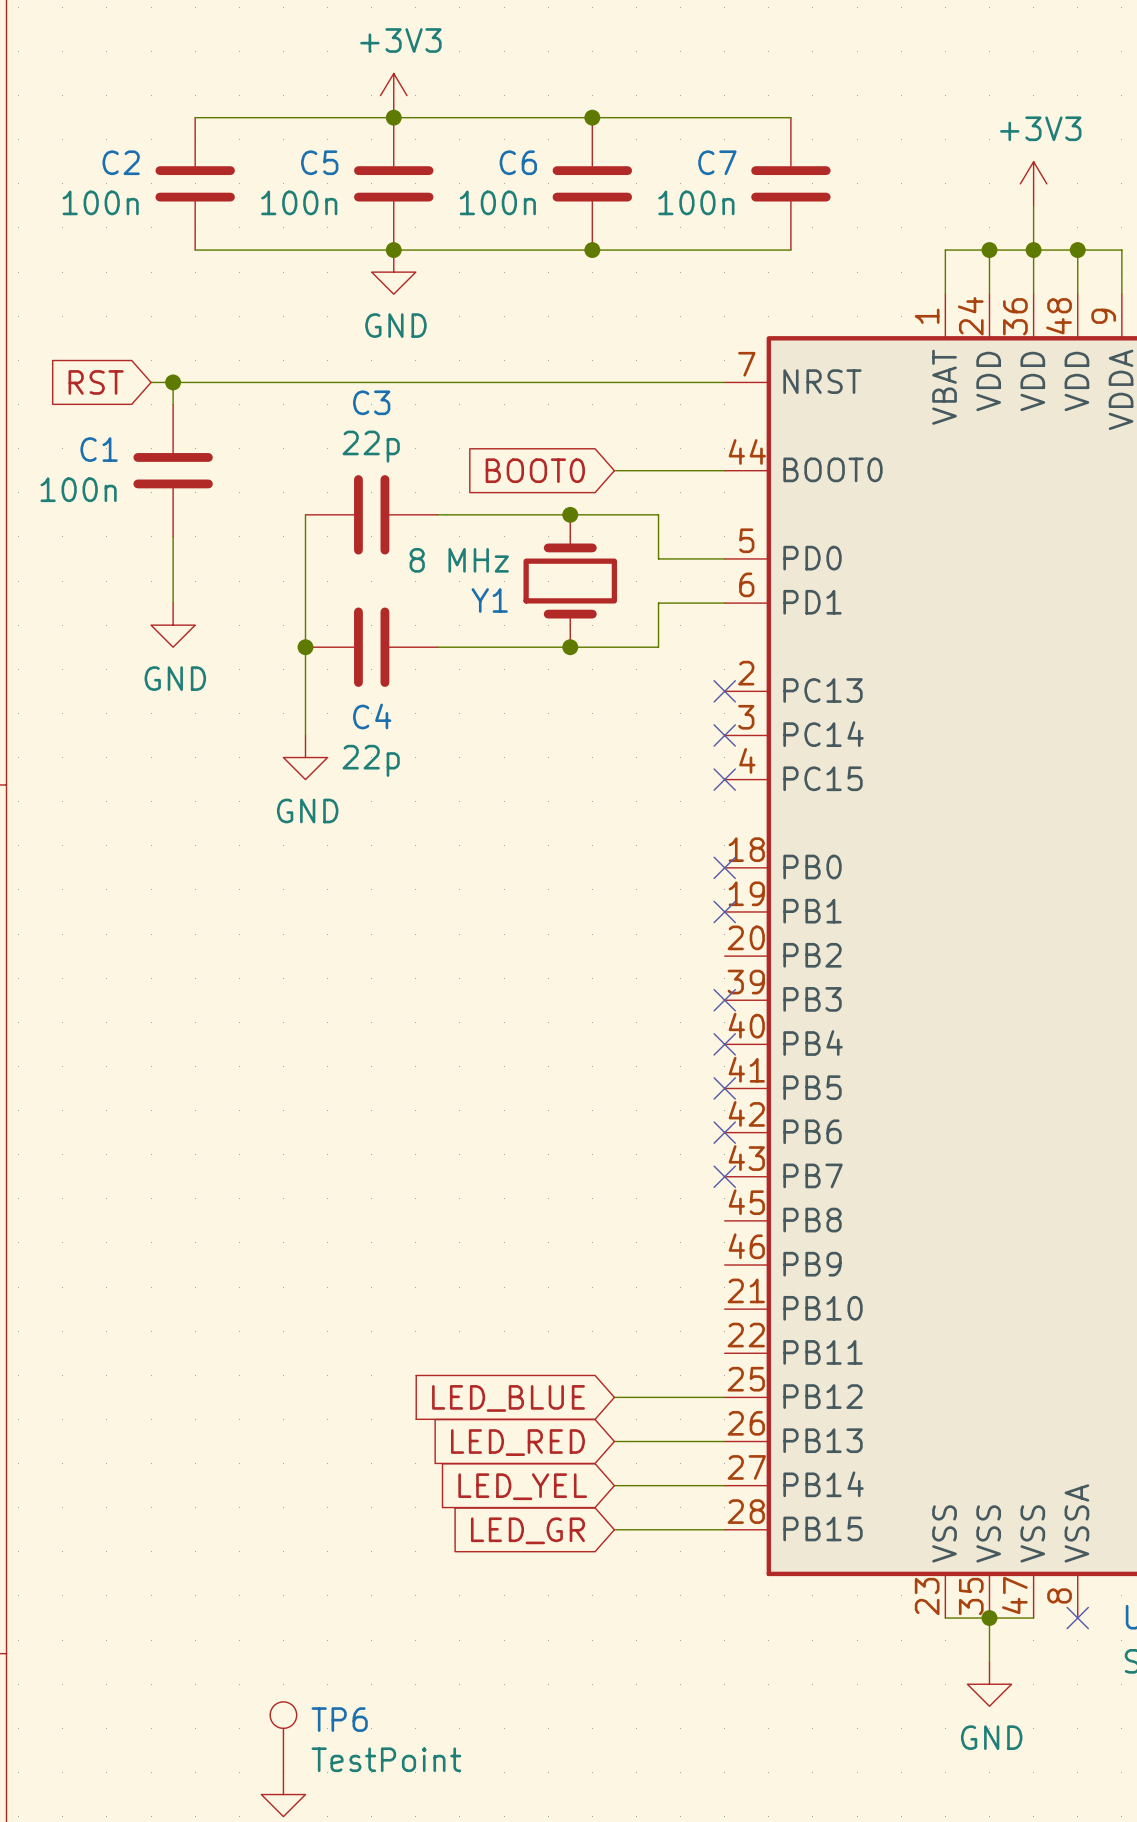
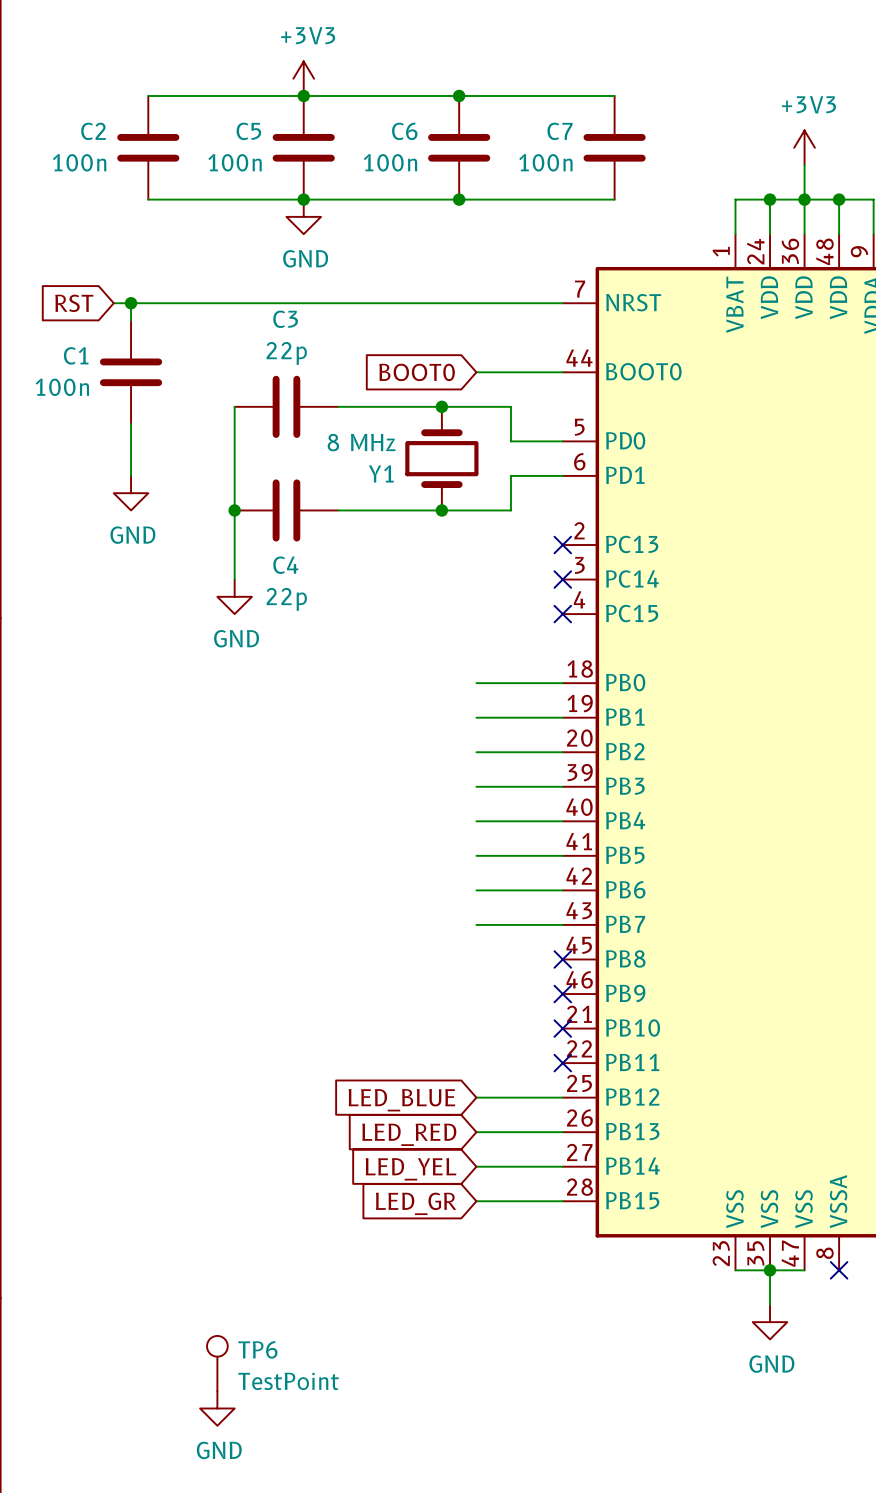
wire: none -> (476, 683) (562, 683)
no-connect mark: (724, 867) -> none
wire: none -> (476, 717) (562, 717)
no-connect mark: (724, 911) -> none
wire: none -> (476, 752) (562, 752)
wire: none -> (476, 786) (562, 786)
no-connect mark: (724, 1000) -> none
wire: none -> (476, 821) (562, 821)
no-connect mark: (724, 1044) -> none
wire: none -> (476, 855) (562, 855)
no-connect mark: (724, 1088) -> none
wire: none -> (476, 890) (562, 890)
no-connect mark: (724, 1132) -> none
wire: none -> (476, 924) (562, 924)
no-connect mark: (724, 1176) -> none
no-connect mark: none -> (562, 959)
no-connect mark: none -> (562, 994)
no-connect mark: none -> (562, 1028)
no-connect mark: none -> (562, 1063)

